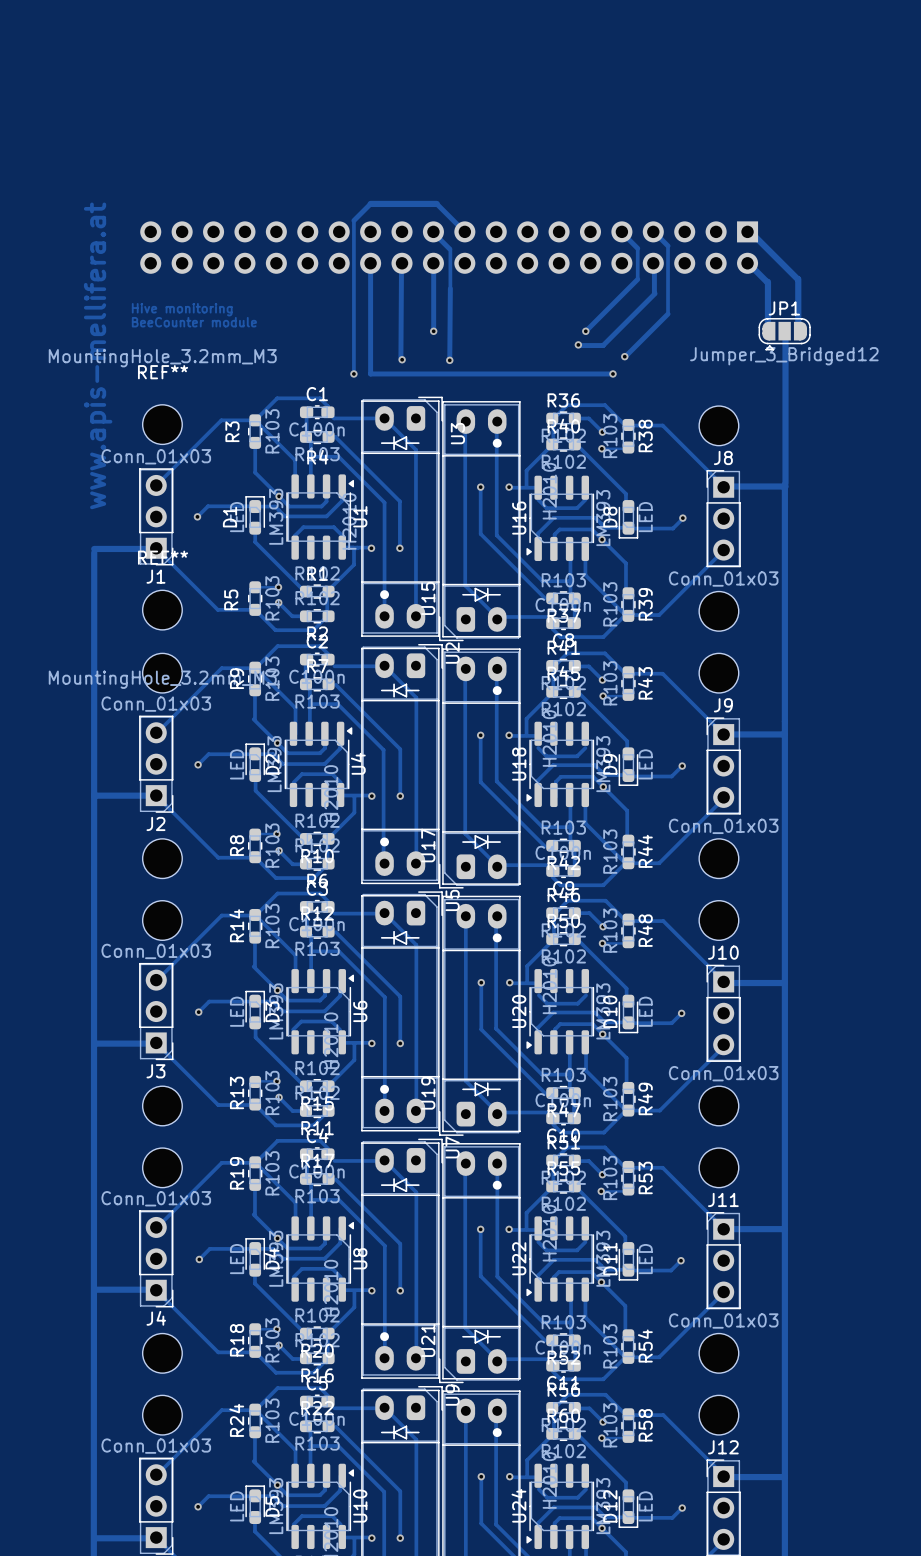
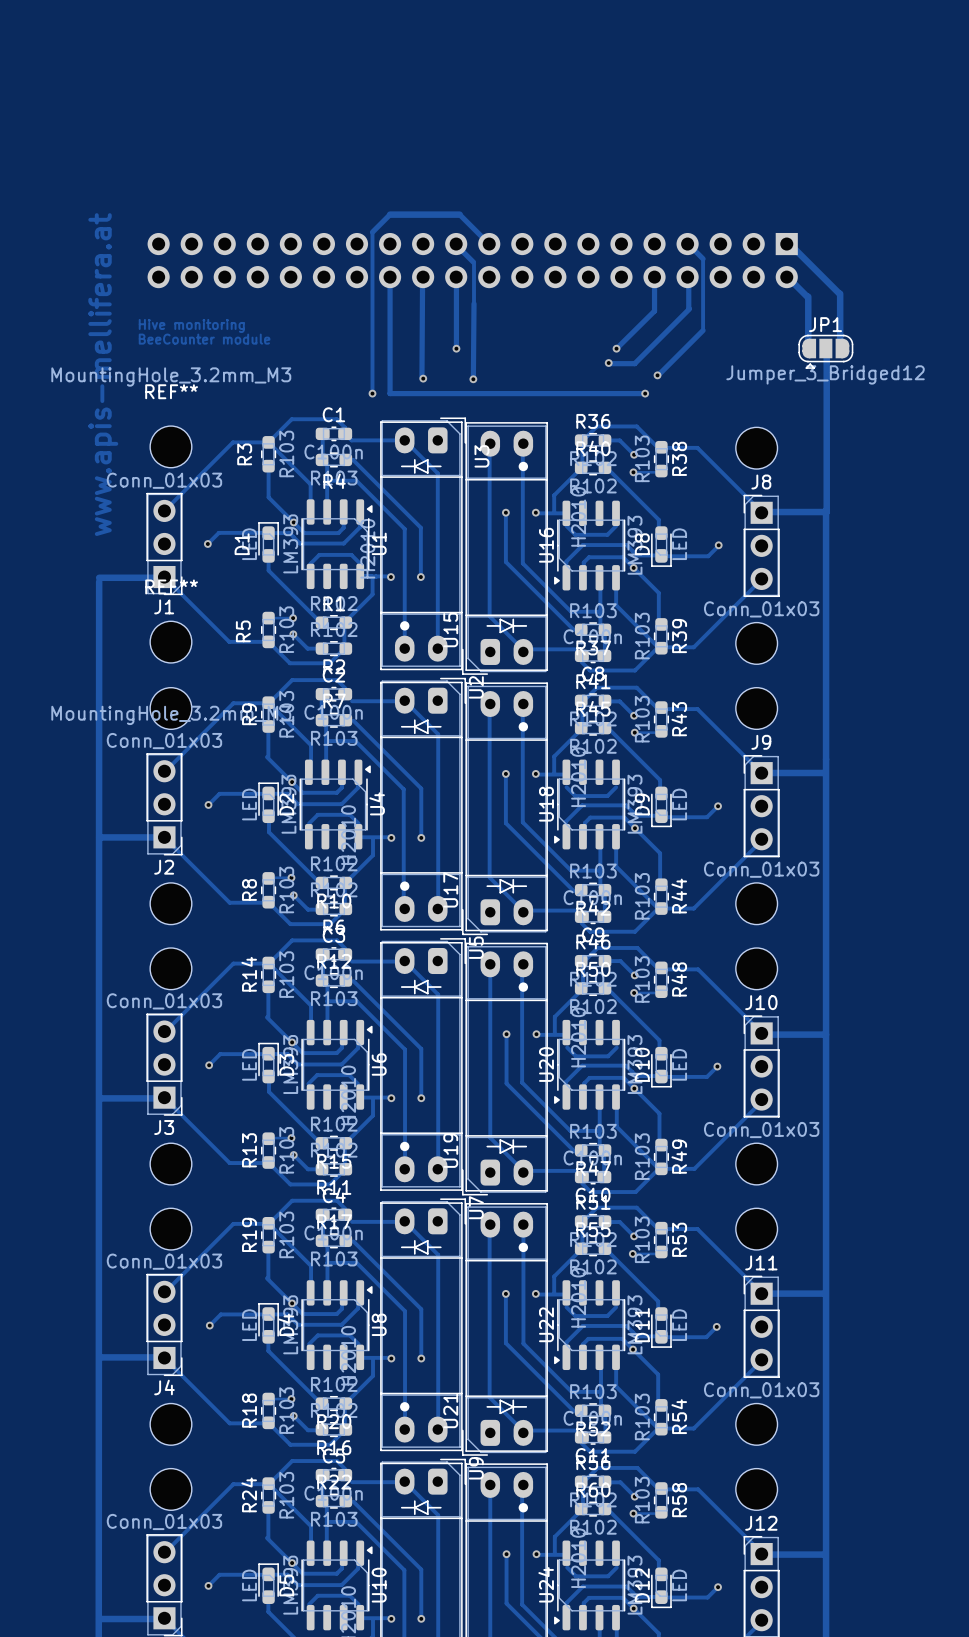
track: (621, 231) (637, 248) (637, 279) (585, 331) -> (654, 278) (654, 311) (616, 349)

